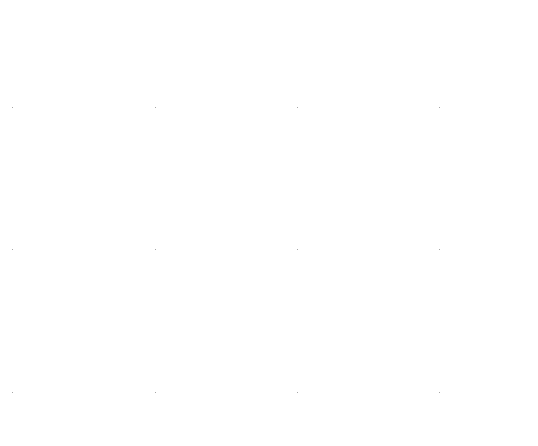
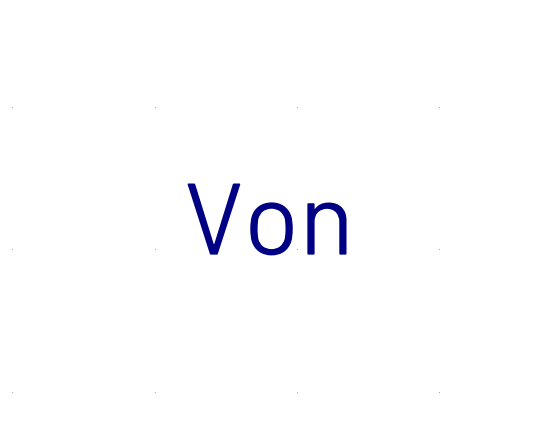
text: none -> Von (267, 219)

